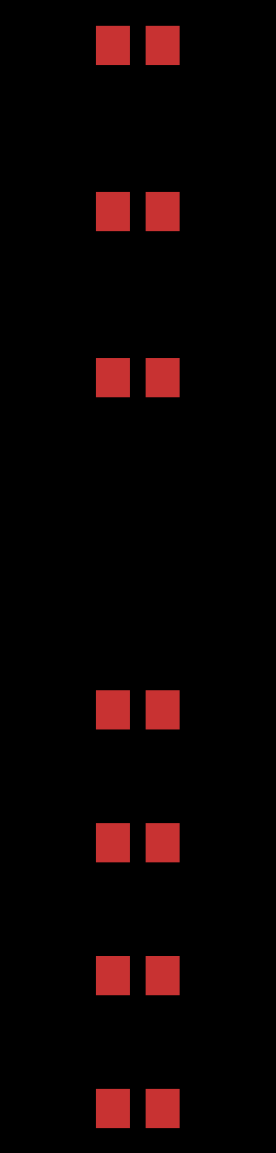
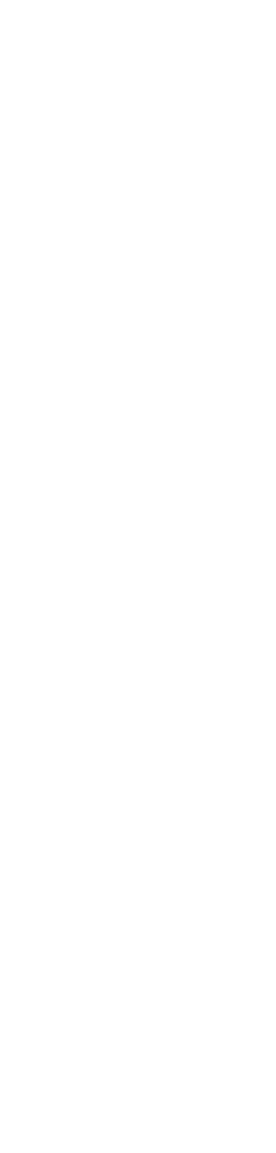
part: (137, 45) -> none
part: (137, 211) -> none
part: (137, 377) -> none
part: (137, 709) -> none
part: (137, 842) -> none
part: (137, 975) -> none
part: (137, 1108) -> none

